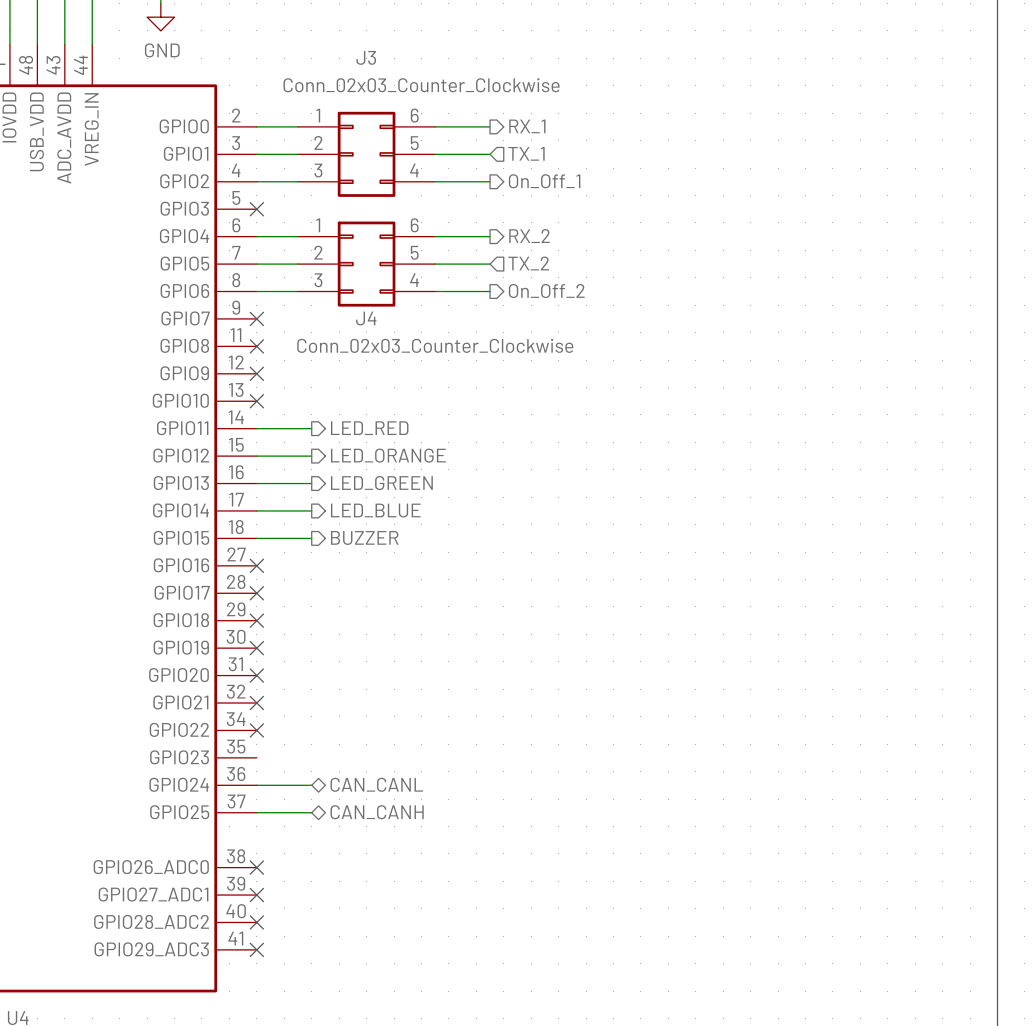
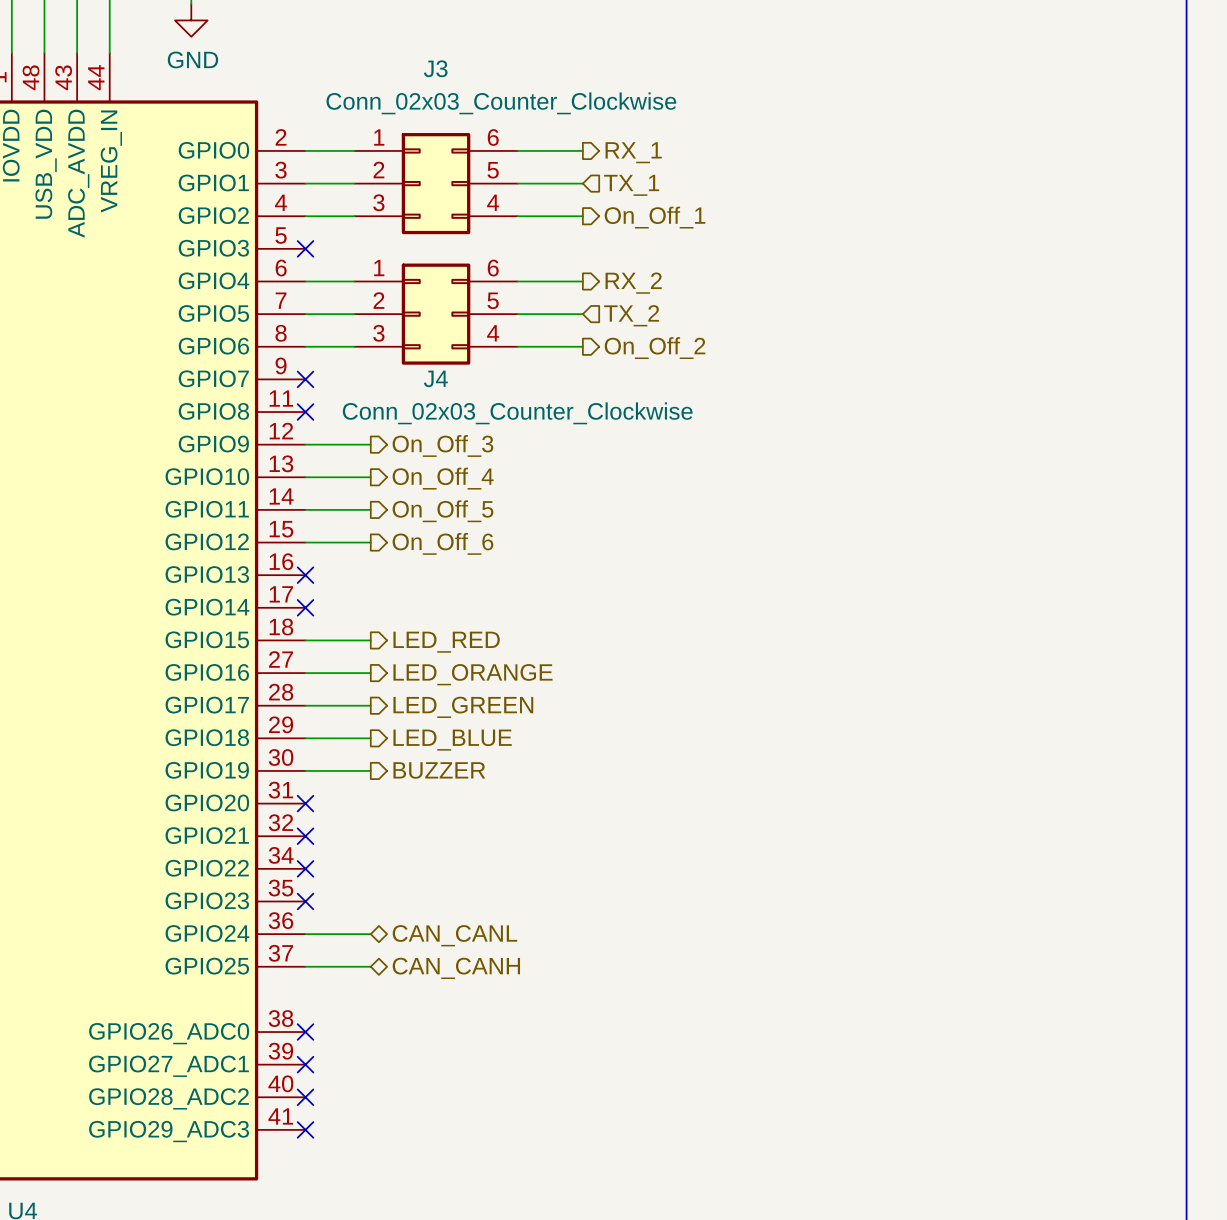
wire: none -> (305, 444) (370, 444)
no-connect mark: (256, 373) -> none
hierarchical label: none -> On_Off_3 (442, 445)
hierarchical label: none -> On_Off_4 (443, 478)
wire: none -> (305, 477) (370, 477)
no-connect mark: (256, 401) -> none
hierarchical label: LED_RED (369, 428) -> On_Off_5 (442, 511)
hierarchical label: LED_ORANGE (388, 455) -> On_Off_6 (442, 543)
wire: (256, 483) (311, 483) -> (305, 673) (370, 673)
no-connect mark: none -> (305, 575)
hierarchical label position: LED_GREEN (381, 483) -> LED_GREEN (463, 707)
wire: (256, 510) (311, 510) -> (305, 705) (370, 705)
no-connect mark: none -> (305, 607)
hierarchical label position: LED_BLUE (375, 510) -> LED_BLUE (452, 740)
hierarchical label: BUZZER (364, 537) -> LED_RED (446, 642)
no-connect mark: (256, 565) -> none
hierarchical label: none -> LED_ORANGE (473, 674)
no-connect mark: (256, 593) -> none
wire: none -> (305, 738) (370, 738)
no-connect mark: (256, 620) -> none
hierarchical label: none -> BUZZER (439, 770)
wire: none -> (305, 770) (370, 770)
no-connect mark: (256, 648) -> none
no-connect mark: none -> (305, 901)

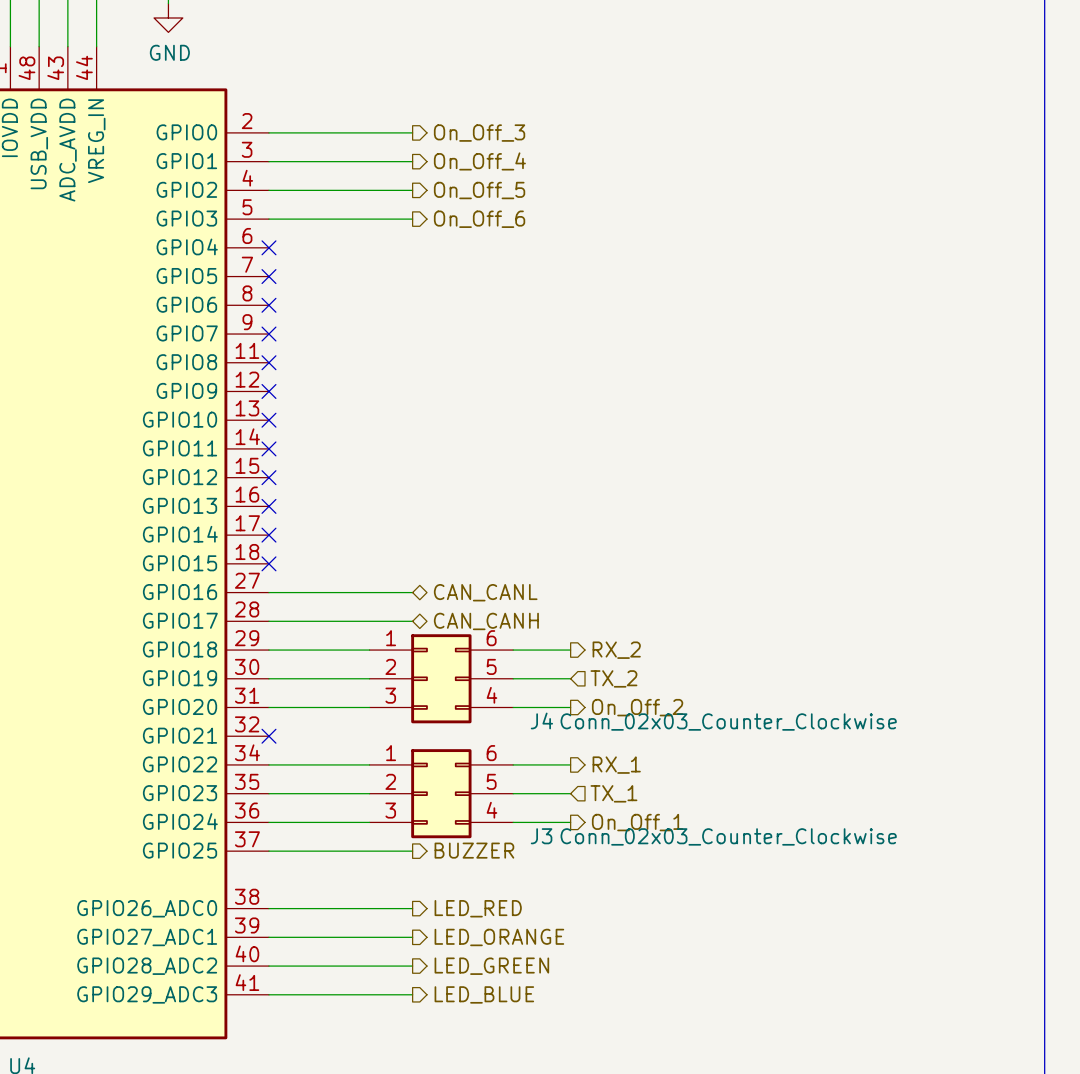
J3 name position: J3 (435, 68) -> J3 (541, 836)
J3 value position: Conn_02x03_Counter_Clockwise (501, 103) -> Conn_02x03_Counter_Clockwise (728, 836)
wire: (517, 150) (582, 150) -> none
hierarchical label: RX_1 (633, 152) -> none
J3 position: (436, 183) -> (441, 793)
wire: (517, 183) (582, 183) -> none
hierarchical label: TX_1 (631, 185) -> none
wire: (517, 216) (582, 216) -> none
hierarchical label: On_Off_1 (655, 217) -> none
wire: none -> (268, 219) (412, 219)
no-connect mark: (305, 248) -> none
wire: (305, 281) (354, 281) -> none
no-connect mark: none -> (268, 247)
wire: (517, 281) (582, 281) -> none
hierarchical label: RX_2 (633, 283) -> none
wire: (305, 314) (354, 314) -> none
no-connect mark: none -> (268, 276)
J4 position: (436, 314) -> (441, 678)
wire: (517, 314) (582, 314) -> none
hierarchical label: TX_2 (631, 315) -> none
wire: (305, 346) (354, 346) -> none
no-connect mark: none -> (268, 305)
wire: (517, 346) (582, 346) -> none
hierarchical label: On_Off_2 (654, 348) -> none
J4 name position: J4 (435, 378) -> J4 (541, 720)
J4 value position: Conn_02x03_Counter_Clockwise (517, 413) -> Conn_02x03_Counter_Clockwise (728, 722)
wire: (305, 444) (370, 444) -> none
no-connect mark: none -> (268, 391)
hierarchical label position: On_Off_3 (442, 445) -> On_Off_3 (479, 133)
wire: (305, 477) (370, 477) -> none
no-connect mark: none -> (268, 420)
hierarchical label position: On_Off_4 (443, 478) -> On_Off_4 (479, 161)
wire: (305, 509) (370, 509) -> none
no-connect mark: none -> (268, 448)
hierarchical label position: On_Off_5 (442, 511) -> On_Off_5 (479, 190)
wire: (305, 542) (370, 542) -> none
no-connect mark: none -> (268, 477)
hierarchical label position: On_Off_6 (442, 543) -> On_Off_6 (479, 219)
wire: (305, 640) (370, 640) -> (513, 650) (570, 650)
no-connect mark: none -> (268, 563)
hierarchical label: LED_RED (446, 642) -> none
wire: none -> (326, 592) (412, 592)
hierarchical label: LED_ORANGE (473, 674) -> none
wire: none -> (326, 621) (412, 621)
hierarchical label: LED_GREEN (463, 707) -> none
wire: none -> (326, 650) (369, 650)
hierarchical label: none -> RX_2 (616, 650)
hierarchical label: LED_BLUE (452, 740) -> none
wire: none -> (326, 678) (369, 678)
hierarchical label position: BUZZER (439, 770) -> BUZZER (474, 850)
wire: none -> (513, 678) (570, 678)
hierarchical label: none -> TX_2 (613, 678)
wire: none -> (268, 707) (369, 707)
no-connect mark: (305, 803) -> none
wire: none -> (513, 707) (570, 707)
hierarchical label: none -> On_Off_2 (637, 707)
wire: none -> (268, 764) (369, 764)
no-connect mark: (305, 868) -> none
wire: none -> (513, 764) (570, 764)
hierarchical label: none -> RX_1 (616, 765)
wire: none -> (268, 793) (369, 793)
no-connect mark: (305, 901) -> none
wire: none -> (513, 793) (570, 793)
hierarchical label: none -> TX_1 (613, 793)
wire: none -> (326, 822) (369, 822)
wire: none -> (513, 822) (570, 822)
hierarchical label position: CAN_CANL (454, 935) -> CAN_CANL (485, 592)
hierarchical label: none -> On_Off_1 (637, 822)
wire: none -> (326, 851) (412, 851)
hierarchical label position: CAN_CANH (456, 968) -> CAN_CANH (486, 621)
wire: none -> (268, 908) (412, 908)
no-connect mark: (305, 1032) -> none
hierarchical label: none -> LED_RED (478, 908)
wire: none -> (268, 937) (412, 937)
no-connect mark: (305, 1064) -> none
hierarchical label: none -> LED_ORANGE (499, 937)
wire: none -> (268, 966) (412, 966)
no-connect mark: (305, 1097) -> none
hierarchical label: none -> LED_GREEN (491, 966)
wire: none -> (268, 994) (412, 994)
no-connect mark: (305, 1129) -> none
hierarchical label: none -> LED_BLUE (484, 994)

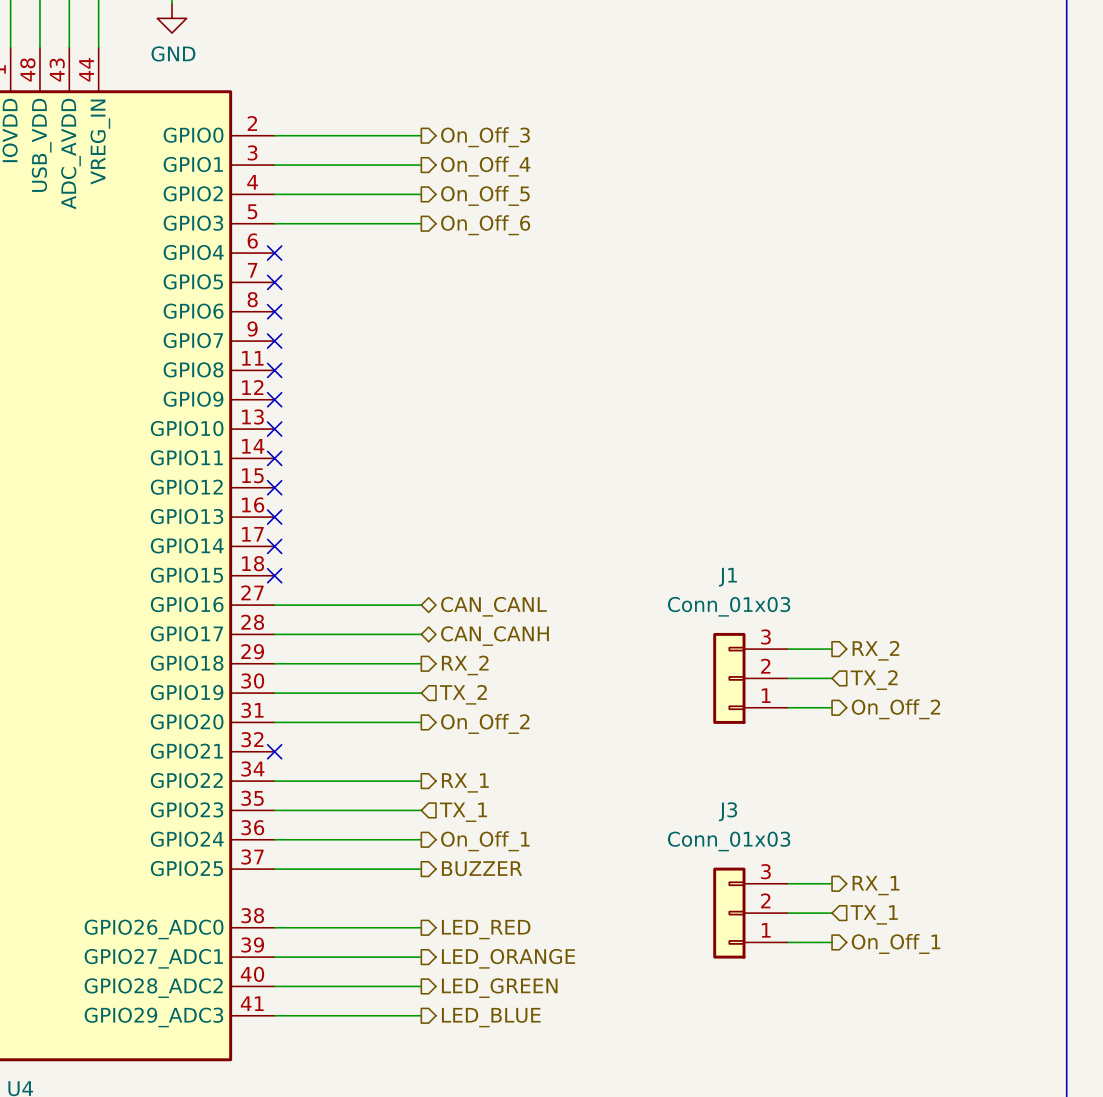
wire: none -> (788, 649) (832, 649)
hierarchical label: none -> RX_2 (875, 650)
hierarchical label: none -> RX_2 (465, 665)
wire: (513, 650) (570, 650) -> none
hierarchical label: RX_2 (616, 650) -> none
J1: none -> Conn_01x03 (750, 678)
wire: none -> (788, 678) (832, 678)
hierarchical label: none -> TX_2 (874, 680)
J4: Conn_02x03_Counter_Clockwise (441, 678) -> none
hierarchical label: none -> TX_2 (463, 694)
wire: (513, 678) (570, 678) -> none
hierarchical label: TX_2 (613, 678) -> none
wire: none -> (788, 707) (832, 707)
hierarchical label: none -> On_Off_2 (895, 709)
hierarchical label: none -> On_Off_2 (485, 723)
wire: (513, 707) (570, 707) -> none
hierarchical label: On_Off_2 (637, 707) -> none
J3 symbol: [369, 749, 514, 839] -> [713, 867, 789, 959]
wire: (513, 764) (570, 764) -> none
hierarchical label: none -> RX_1 (465, 782)
hierarchical label: RX_1 (616, 765) -> none
hierarchical label: none -> TX_1 (463, 812)
wire: (513, 793) (570, 793) -> none
hierarchical label: TX_1 (613, 793) -> none
hierarchical label: none -> On_Off_1 (485, 841)
wire: (513, 822) (570, 822) -> none
hierarchical label: On_Off_1 (637, 822) -> none
J3 name position: J3 (541, 836) -> J3 (728, 811)
J3 value: Conn_02x03_Counter_Clockwise (728, 836) -> Conn_01x03 (729, 841)
wire: none -> (788, 883) (832, 883)
hierarchical label: none -> RX_1 (876, 885)
wire: none -> (788, 913) (832, 913)
hierarchical label: none -> TX_1 (874, 914)
wire: none -> (788, 942) (832, 942)
hierarchical label: none -> On_Off_1 (896, 943)

